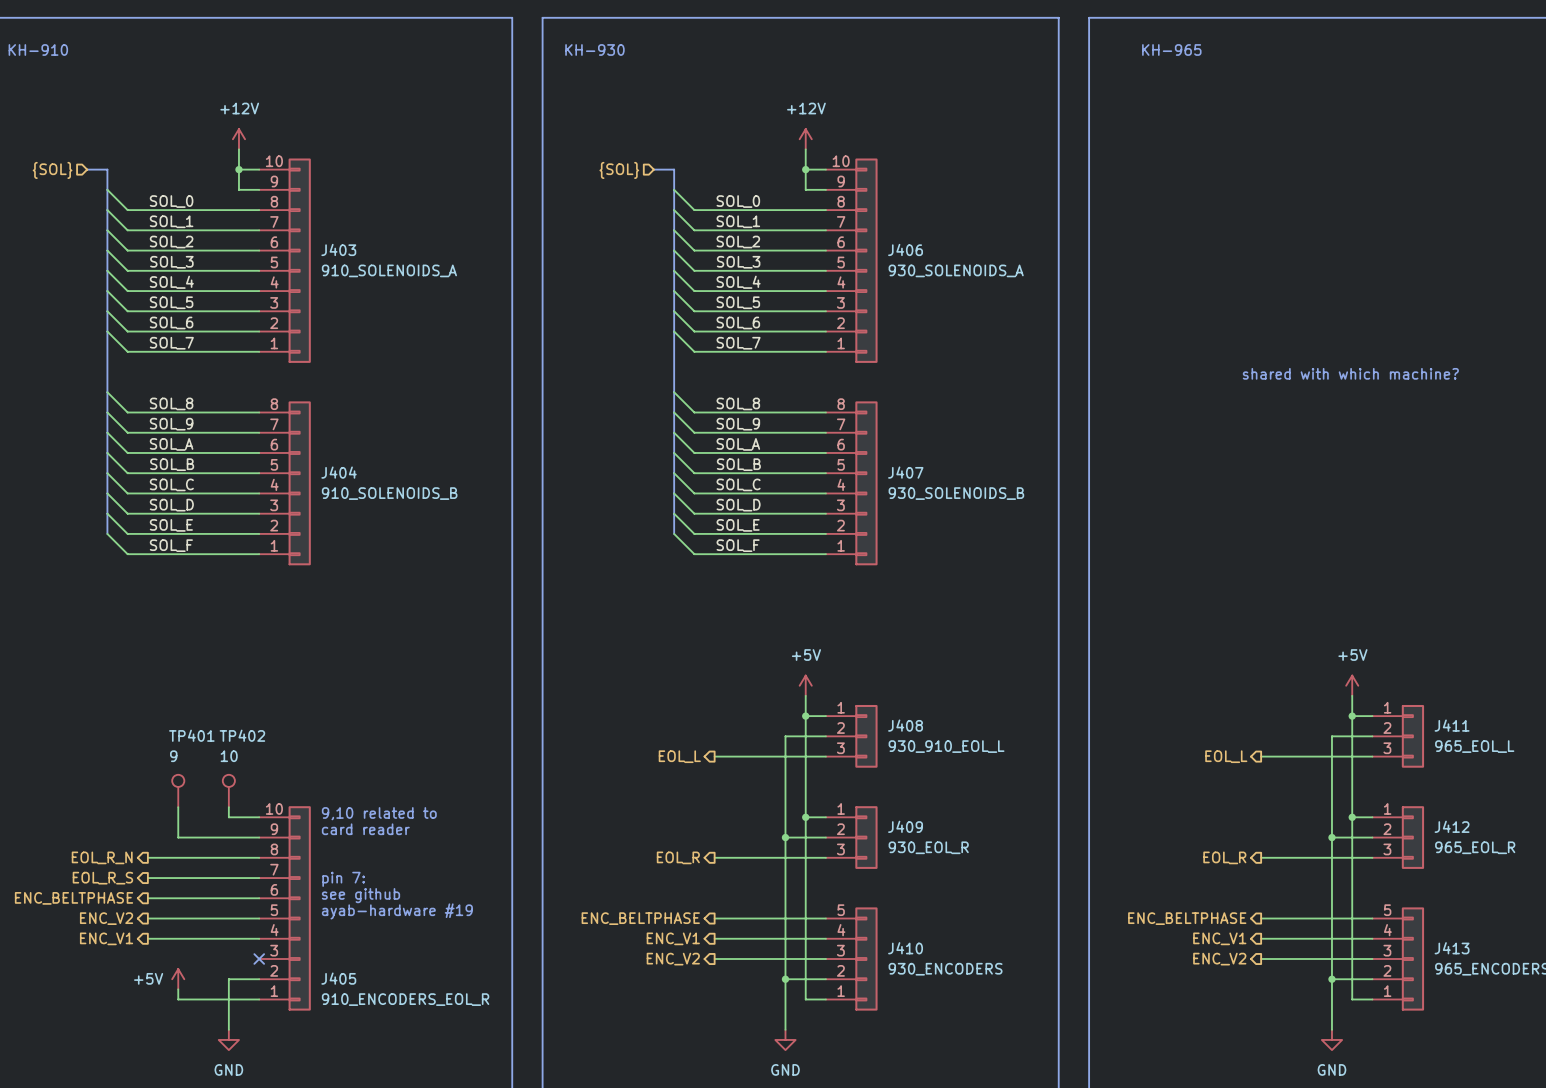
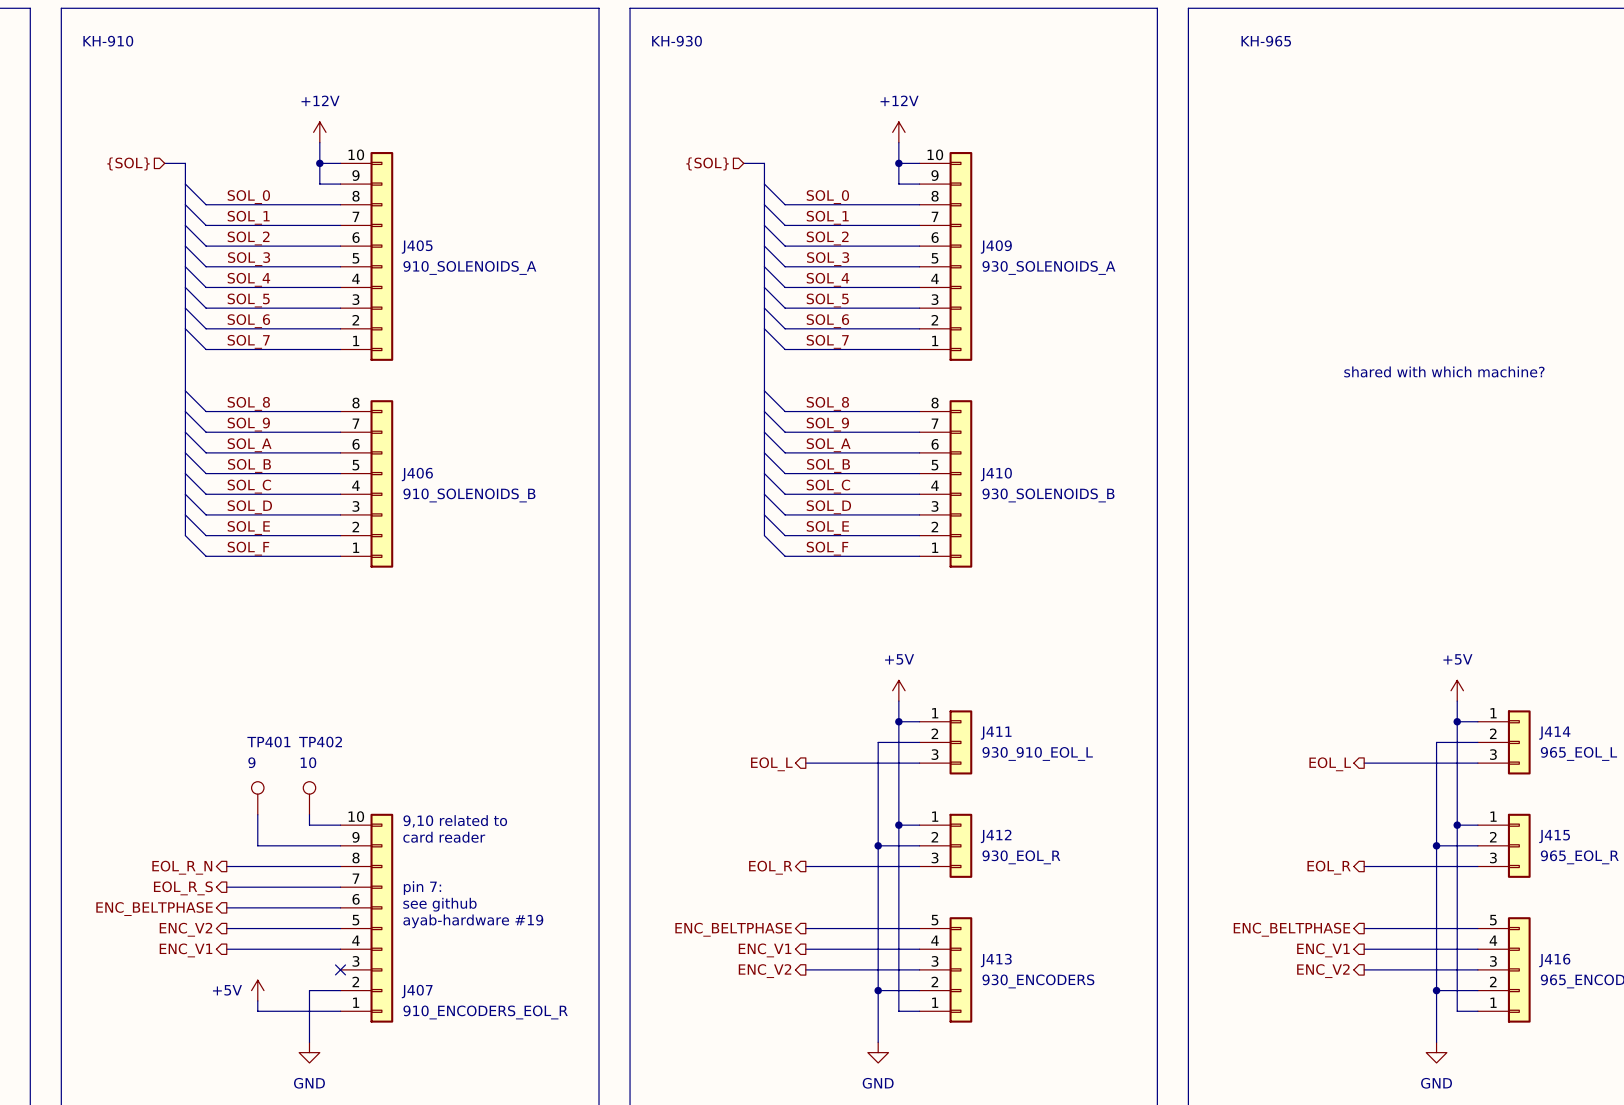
J403 name: J403 (338, 249) -> J405 (417, 247)
J406 name: J406 (905, 249) -> J409 (996, 247)
J404 name: J404 (339, 472) -> J406 (417, 474)
J407 name: J407 (905, 472) -> J410 (996, 474)
J408 name: J408 (905, 725) -> J411 (996, 733)
J411 name: J411 (1452, 725) -> J414 (1554, 733)
J409 name: J409 (905, 826) -> J412 (996, 836)
J412 name: J412 (1452, 826) -> J415 (1554, 836)
J410 name: J410 (905, 948) -> J413 (996, 960)
J413 name: J413 (1452, 948) -> J416 (1554, 960)
J405 name: J405 (338, 978) -> J407 (417, 991)

